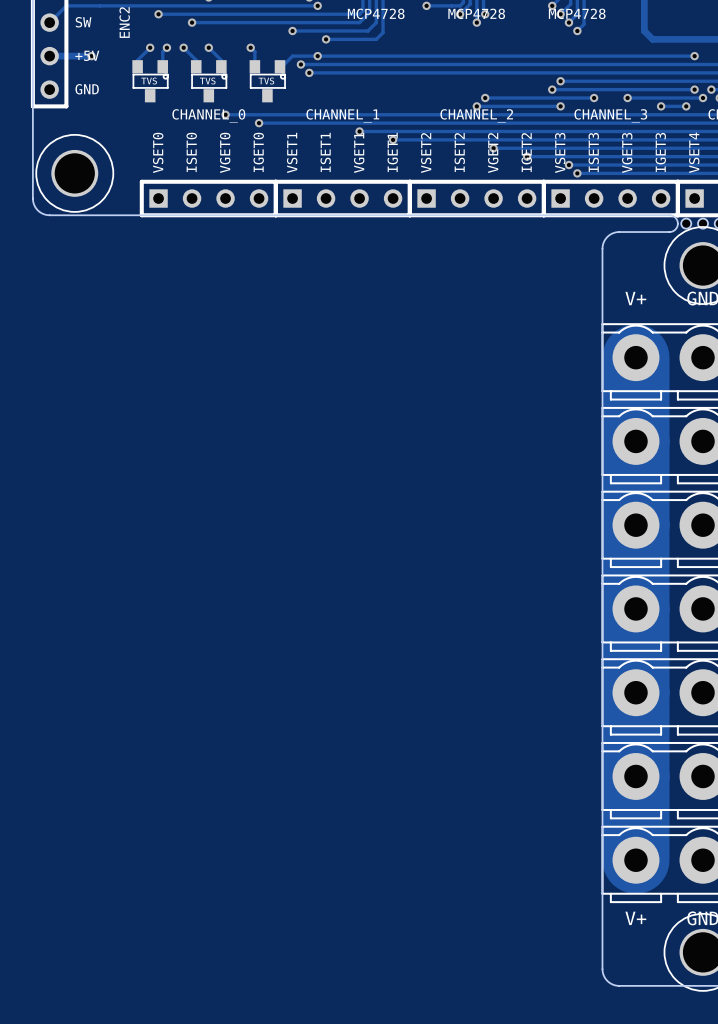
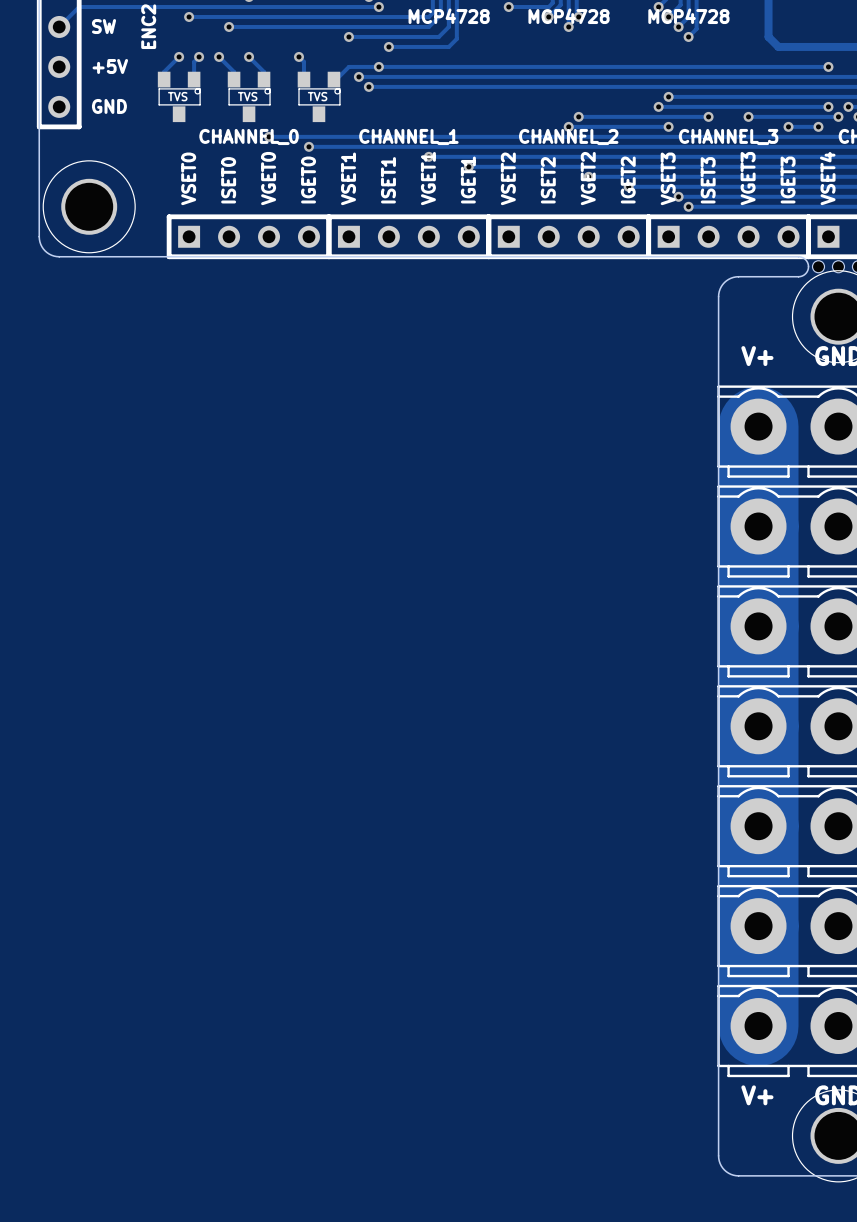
track: (49, 56) (91, 56) -> none
via: (91, 56) -> none

